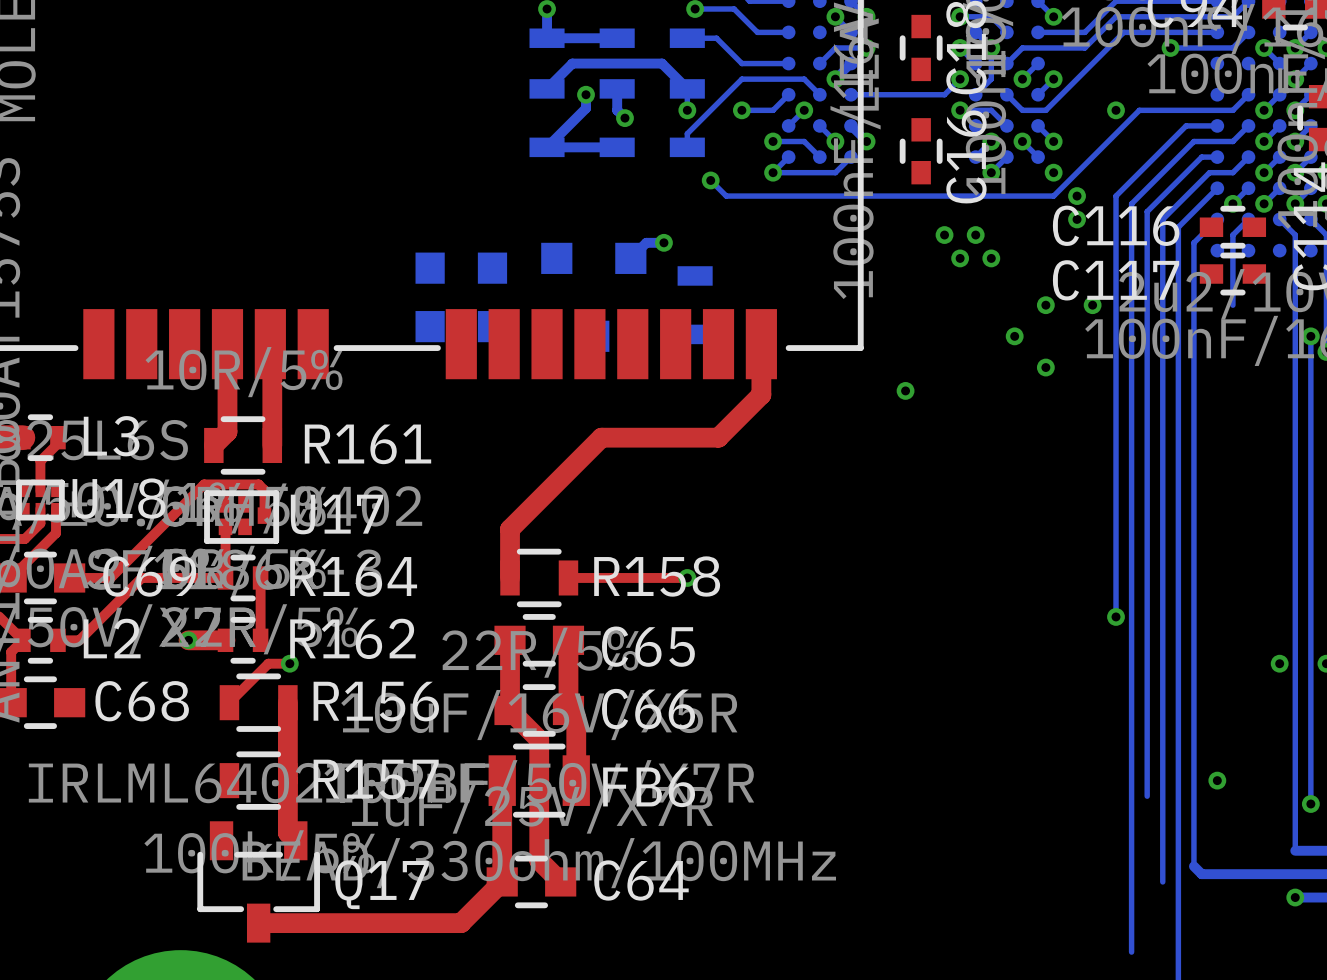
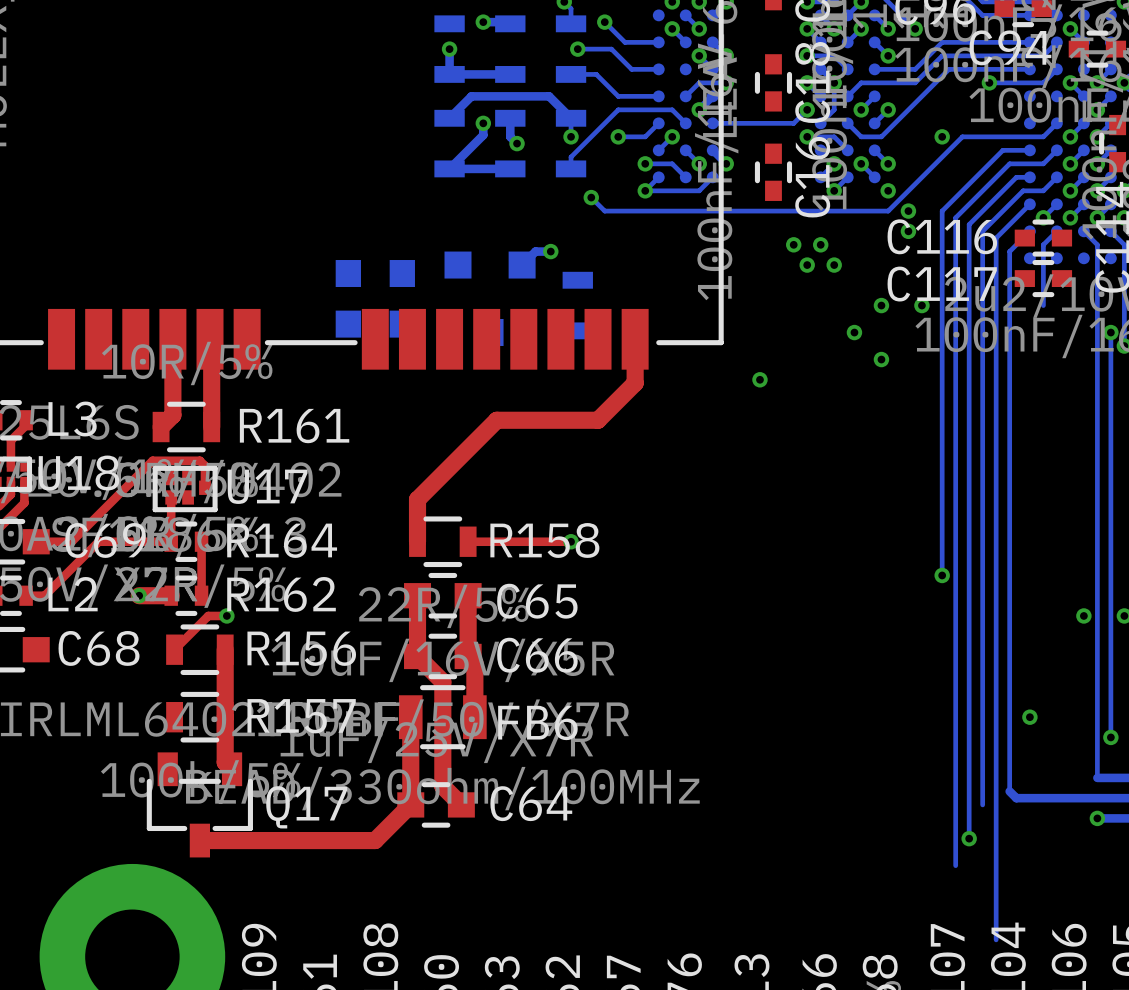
bottom track: none -> (969, 730) (969, 838)
via: none -> (969, 838)

